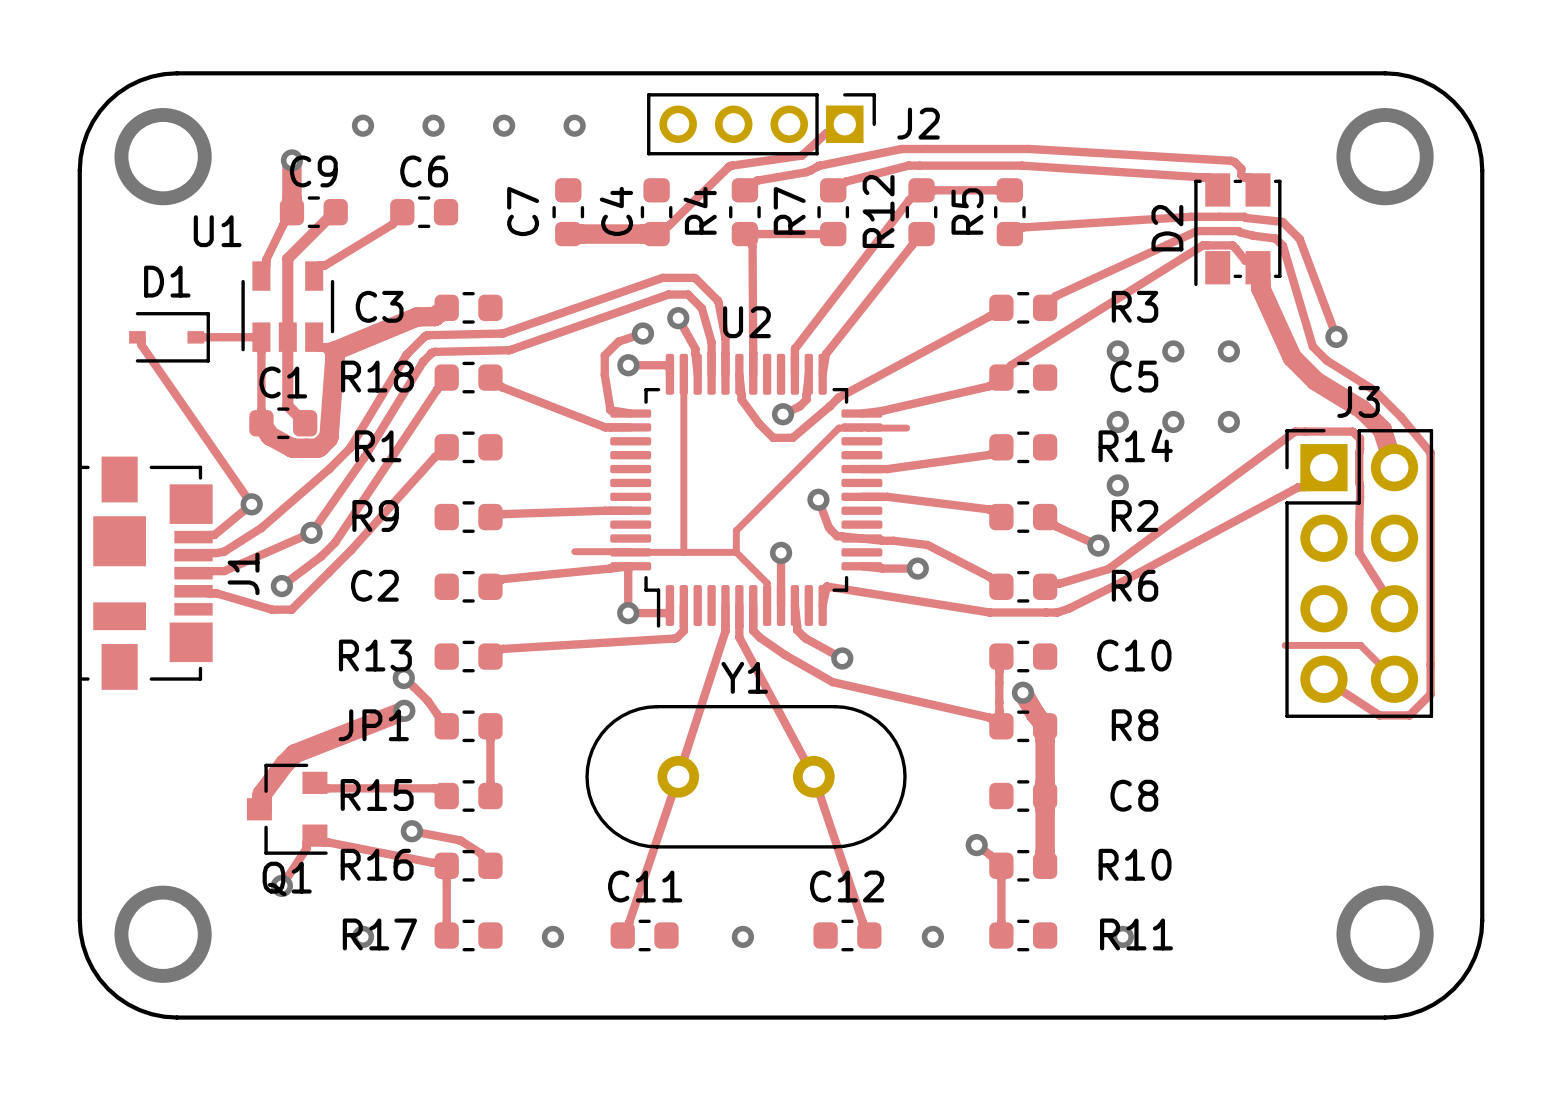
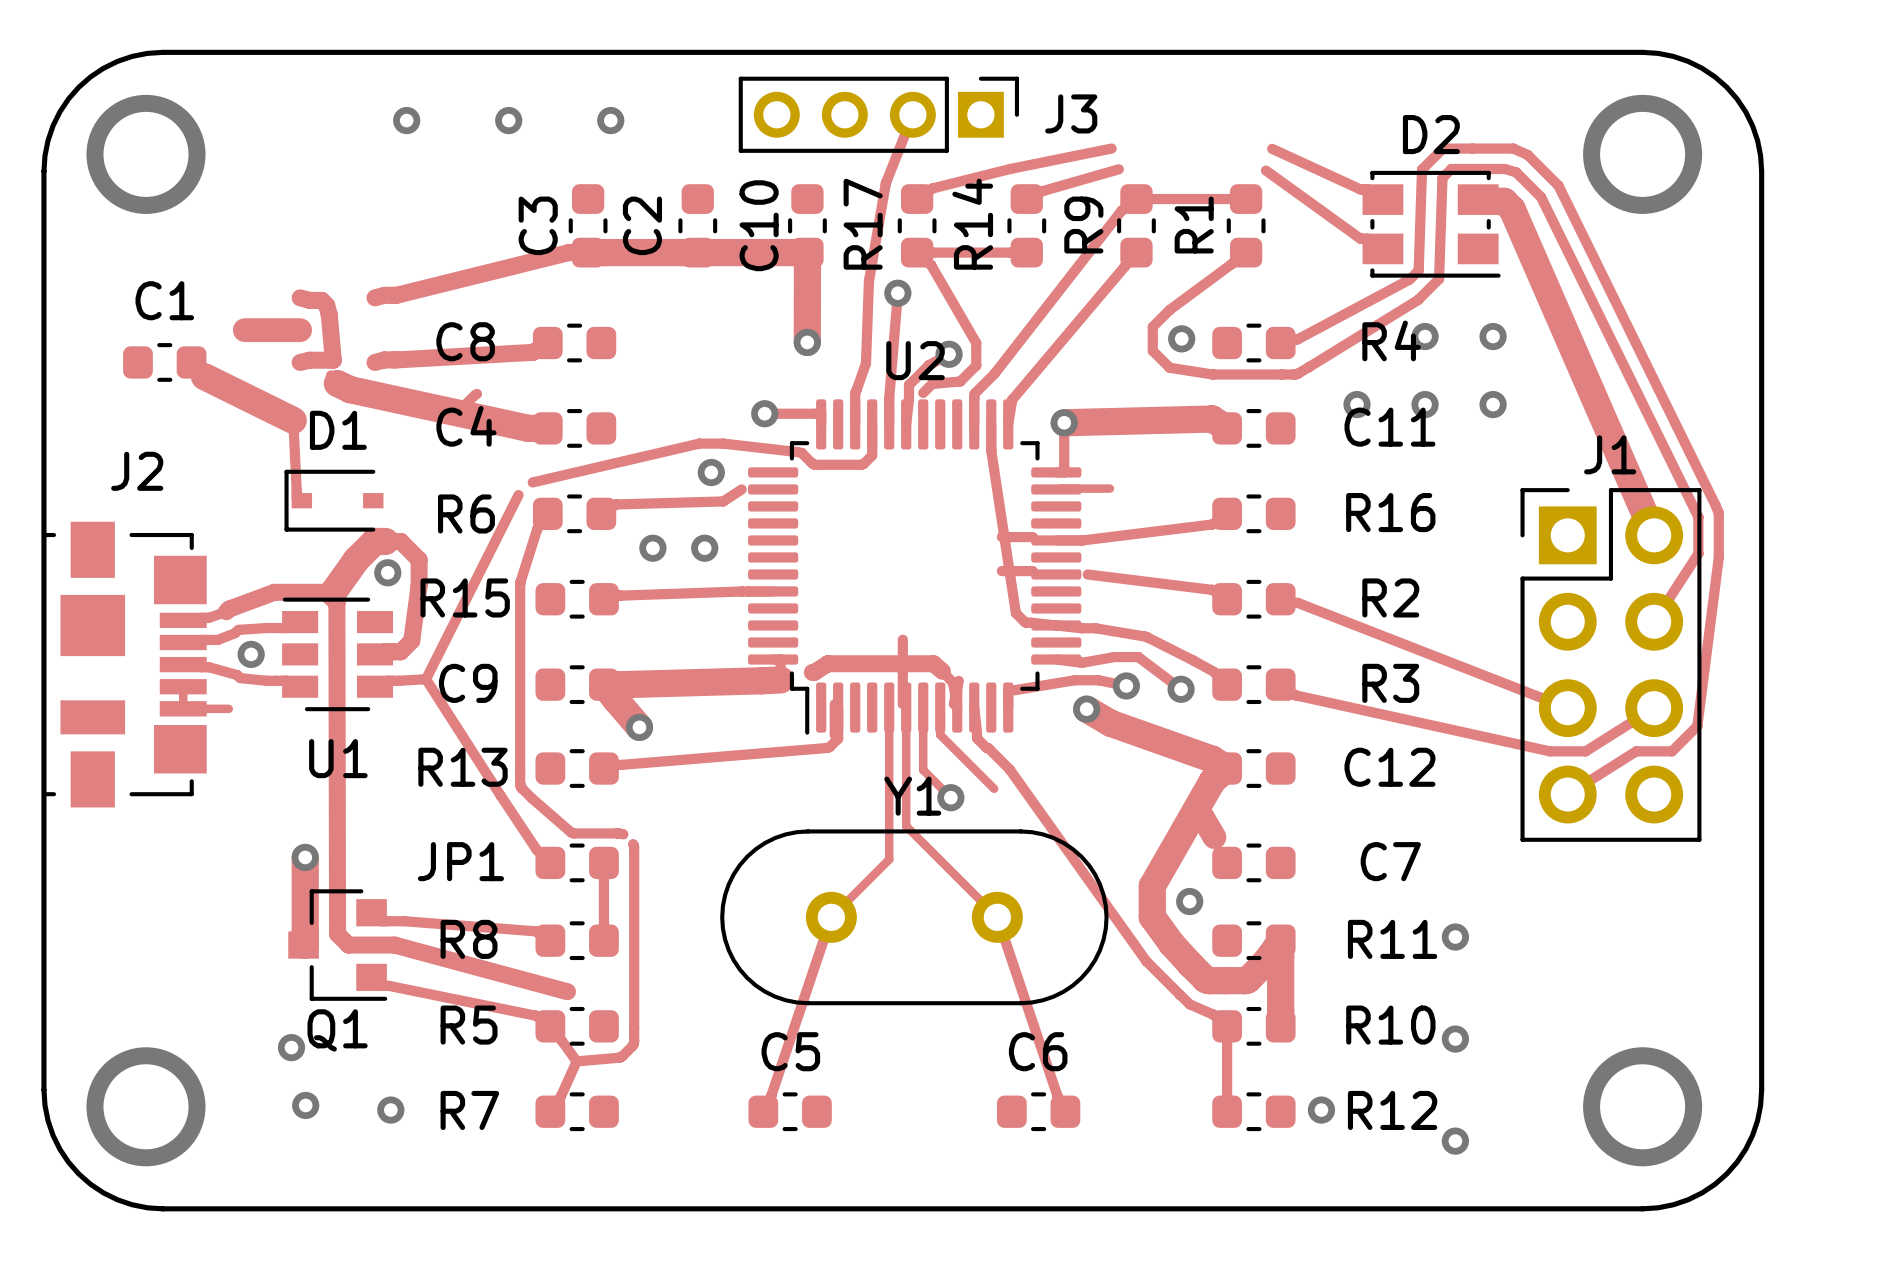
J2 name: J2 (918, 123) -> J3 (1071, 113)
track: none -> (912, 114) (886, 182)
track: (844, 124) (830, 133) (826, 133) (802, 155) (731, 165) -> none
via position: (363, 125) -> (406, 120)
via: (433, 125) -> none
via: (504, 125) -> none
via: (574, 125) -> none
via: none -> (508, 120)
via: none -> (610, 120)
track: (902, 148) (1029, 148) (1231, 160) (1241, 168) (1241, 175) (1243, 177) (1249, 177) (1258, 189) -> none
track: (901, 149) (819, 165) -> none
track: none -> (1111, 148) (1010, 168) (932, 188) (917, 199)
track: none -> (1272, 148) (1360, 189) (1367, 189) (1382, 199)
track: (291, 160) (291, 212) (283, 224) (266, 259) (266, 265) (261, 276) -> none
via: (291, 160) -> none
track: (908, 165) (845, 181) (833, 190) -> none
track: (909, 165) (1022, 165) (1209, 177) (1217, 189) -> none
track: (818, 166) (806, 172) (757, 180) (744, 190) -> none
track: (728, 167) (669, 225) (656, 234) (568, 234) -> none
track: none -> (1118, 169) (1043, 190)
track: none -> (1265, 170) (1360, 238) (1367, 238) (1382, 248)
C9 name position: C9 (313, 171) -> C9 (468, 683)
C6 name position: C6 (424, 171) -> C6 (1038, 1051)
track: none -> (885, 183) (868, 281) (865, 363) (855, 393) (855, 424)
track: (1009, 190) (921, 190) (909, 199) (794, 348) (794, 374) -> none
track: none -> (1246, 199) (1136, 199) (1121, 210) (994, 373) (974, 393) (974, 424)
R4 name position: R4 (700, 210) -> R4 (1391, 340)
C7 name position: C7 (523, 211) -> C7 (1390, 861)
R12 name position: R12 (878, 211) -> R12 (1392, 1110)
C9 position: (313, 212) -> (577, 684)
track: (335, 212) (287, 258) (287, 405) (305, 423) -> none
C6 position: (424, 212) -> (1038, 1111)
C7 rotation: 0° (568, 212) -> 90° clockwise (1253, 862)
C7 position: (568, 212) -> (1253, 862)
C4 rotation: 0° (656, 212) -> 90° clockwise (574, 428)
C4 position: (656, 212) -> (574, 428)
R4 rotation: 0° (744, 212) -> 90° clockwise (1253, 343)
R4 position: (744, 212) -> (1253, 343)
R7 rotation: 0° (833, 212) -> 90° clockwise (577, 1111)
R7 position: (833, 212) -> (577, 1111)
R12 rotation: 0° (921, 212) -> 90° clockwise (1253, 1111)
R12 position: (921, 212) -> (1253, 1111)
R5 rotation: 0° (1009, 212) -> 90° clockwise (577, 1026)
R5 position: (1009, 212) -> (577, 1026)
track: (392, 224) (324, 265) (319, 265) (314, 276) -> none
track: (1023, 227) (1191, 216) (1244, 216) (1282, 221) (1299, 238) (1336, 336) -> none
D2 name position: D2 (1167, 228) -> D2 (1431, 134)
D2 rotation: 0° (1237, 229) -> 90° counterclockwise (1431, 224)
U1 name position: U1 (217, 231) -> U1 (338, 758)
track: (833, 234) (744, 234) (752, 246) (753, 374) -> none
track: (921, 234) (825, 354) (822, 374) -> none
track: none -> (1026, 252) (917, 252) (931, 265)
track: none -> (931, 265) (976, 343) (976, 365) (960, 381) (932, 383) (923, 392)
track: none -> (1124, 266) (1012, 399) (1008, 424)
U1 footprint: [241, 261, 335, 352] -> [282, 597, 394, 712]
track: none -> (897, 293) (889, 398) (889, 424)
via: none -> (897, 293)
track: none -> (300, 297) (321, 300) (326, 305) (333, 360) (309, 360) (300, 362)
track: none -> (374, 297) (396, 295) (568, 252) (807, 252) (807, 342)
track: (1055, 296) (1196, 231) (1238, 231) (1253, 235) (1275, 238) (1283, 245) (1312, 346) (1326, 360) (1374, 390) (1401, 417) (1430, 452) -> (1246, 252) (1169, 309) (1152, 326) (1152, 350) (1169, 367) (1213, 374) (1298, 373) (1418, 299) (1439, 279) (1442, 177) (1451, 168) (1504, 168) (1516, 172) (1541, 197) (1698, 516)
track: none -> (244, 330) (300, 330)
via: none -> (1425, 336)
via: none -> (1493, 336)
track: (446, 307) (434, 316) (417, 317) (335, 350) (329, 436) (320, 446) (293, 448) (270, 436) -> none
C3 rotation: 0° (468, 307) -> 90° clockwise (588, 225)
C3 position: (468, 307) -> (588, 225)
track: (1001, 307) (989, 316) (838, 397) (830, 406) -> none
via: none -> (1181, 338)
R3 position: (1023, 307) -> (1253, 684)
track: none -> (547, 343) (532, 352) (384, 359) (374, 362)
via: none -> (807, 342)
track: (678, 318) (695, 348) (697, 374) -> none
via: (678, 318) -> none
track: none -> (949, 354) (929, 365) (908, 385) (906, 424)
via: none -> (949, 354)
track: (642, 333) (618, 341) (604, 355) (604, 375) (610, 410) (630, 413) -> none
via: (642, 333) -> none
track: (428, 335) (502, 333) (662, 277) (693, 277) (718, 302) (725, 338) (725, 374) -> none
via: (1336, 336) -> none
track: (137, 337) (141, 339) (141, 345) (251, 504) (214, 535) -> (325, 592) (274, 592) (208, 617)
D1 rotation: 0° (169, 337) -> 180° (333, 500)
D1 position: (169, 337) -> (333, 500)
track: (195, 337) (261, 337) (261, 423) (270, 435) -> none
track: (424, 337) (407, 354) -> none
track: none -> (204, 376) (293, 420) (296, 498) (301, 500)
track: none -> (337, 383) (350, 389) (528, 428) (547, 428)
track: (435, 351) (509, 350) (668, 294) (688, 294) (701, 308) (711, 342) (711, 374) -> none
via: (1117, 351) -> none
via position: (1173, 351) -> (1357, 404)
via position: (1228, 351) -> (1425, 404)
track: (406, 355) (349, 448) (329, 469) (261, 527) (224, 551) (212, 553) -> (300, 622) (287, 628) (238, 629) (217, 639) (206, 639)
via: none -> (1493, 404)
track: (422, 362) (364, 456) (311, 532) (224, 571) (193, 573) -> (300, 686) (287, 680) (240, 678) (237, 675) (208, 667) (183, 664)
track: (628, 365) (669, 365) (669, 374) -> none
via: (628, 365) -> none
track: (1010, 365) (1001, 377) (989, 386) (882, 410) (861, 413) -> none
track: (1011, 365) (1202, 245) (1232, 245) (1245, 260) (1249, 260) (1258, 267) (1260, 274) (1260, 288) (1292, 357) (1315, 381) (1361, 409) (1382, 429) (1394, 467) -> (1478, 199) (1504, 201) (1512, 209) (1654, 535)
track: none -> (764, 413) (821, 413) (821, 424)
via: none -> (764, 413)
track: none -> (1211, 419) (1064, 422) (1064, 472) (1056, 472)
track: (683, 374) (683, 552) -> none
track: (739, 374) (741, 399) (759, 424) (773, 437) (792, 437) (829, 406) -> none
track: (808, 374) (806, 399) (799, 406) (783, 414) -> none
via: none -> (1064, 422)
C5 name position: C5 (1134, 376) -> C5 (790, 1051)
track: (446, 377) (335, 542) (321, 556) (281, 586) -> none
R18: (468, 377) -> none
track: none -> (872, 424) (872, 455) (861, 464) (814, 464) (801, 453) (796, 452) (723, 443) (699, 443) (532, 482)
track: none -> (991, 424) (991, 450) (1015, 613) (1026, 622) (1095, 628) (1145, 636) (1213, 671) (1227, 684)
C5 position: (1023, 377) -> (790, 1111)
C1 name position: C1 (283, 382) -> C1 (164, 300)
track: (502, 387) (605, 427) (630, 427) -> none
J3 name: J3 (1358, 401) -> J1 (1610, 454)
via: (783, 414) -> none
via: none -> (711, 472)
via: (1117, 421) -> none
via: (1173, 421) -> none
via: (1228, 421) -> none
C1 position: (283, 423) -> (164, 362)
track: (906, 428) (838, 428) (736, 530) (736, 552) -> none
track: none -> (1109, 488) (1056, 489)
track: none -> (741, 489) (723, 501) (616, 504)
track: none -> (518, 495) (426, 679)
R14 name position: R14 (1135, 445) -> R14 (972, 224)
R1 rotation: 0° (468, 447) -> 90° clockwise (1246, 225)
R1 position: (468, 447) -> (1246, 225)
R14 rotation: 0° (1023, 447) -> 90° clockwise (1026, 225)
R14 position: (1023, 447) -> (1026, 225)
track: none -> (547, 513) (537, 529) (520, 581)
track: none -> (1227, 513) (1212, 524) (1082, 540) (1056, 540)
track: (989, 454) (887, 469) -> none
track: (434, 457) (351, 550) (291, 609) (272, 609) (216, 593) (193, 591) -> (228, 708) (183, 708) (183, 686)
track: (1323, 467) (1304, 487) (1298, 487) (1115, 585) (1057, 612) (989, 612) (827, 586) -> none
via: none -> (652, 548)
via: none -> (704, 548)
track: (1430, 482) (1430, 694) -> (1698, 553) (1654, 621)
via: (1117, 485) -> none
U2 position: (746, 490) -> (914, 566)
track: (887, 496) (989, 509) -> (1087, 574) (1212, 589)
via: none -> (387, 572)
track: (818, 499) (828, 527) (837, 536) (927, 544) (989, 577) (1001, 586) -> none
via: (818, 499) -> none
via: (251, 504) -> none
track: none -> (520, 584) (520, 783)
track: (630, 510) (498, 514) (490, 517) -> none
track: none -> (773, 591) (613, 595) (603, 599)
track: none -> (333, 592) (356, 559) (374, 541) (400, 541) (419, 559) (419, 585) (411, 640) (400, 651) (384, 651) (374, 654)
R9 rotation: 0° (468, 517) -> 90° clockwise (1136, 225)
R9 position: (468, 517) -> (1136, 225)
R2 position: (1023, 517) -> (1253, 599)
track: (1045, 517) (1056, 526) (1098, 545) -> none
track: none -> (1280, 599) (1297, 602) (1567, 708)
track: none -> (336, 603) (337, 934) (348, 945) (394, 945) (567, 991)
via: (311, 532) -> none
via: (1098, 545) -> none
track: (574, 551) (630, 551) -> none
track: (630, 552) (736, 552) -> none
track: (736, 552) (767, 583) (767, 605) -> none
via: (781, 552) -> none
via: none -> (251, 654)
track: (861, 566) (917, 568) -> none
via: (917, 568) -> none
track: none -> (773, 659) (780, 659) (780, 679) (603, 684) (639, 727)
track: none -> (1056, 659) (1082, 662) (1114, 657) (1138, 657) (1181, 689)
J1 name: J1 (243, 573) -> J2 (137, 471)
track: (502, 579) (610, 568) (630, 566) (628, 566) (628, 613) (669, 613) (669, 605) -> none
track: none -> (812, 672) (827, 663) (933, 663) (953, 682) (957, 707)
track: none -> (426, 679) (387, 680) (374, 686)
track: none -> (426, 679) (536, 849)
R6 name position: R6 (1135, 585) -> R6 (466, 513)
via: (281, 586) -> none
C2 rotation: 0° (468, 586) -> 90° clockwise (697, 225)
C2 position: (468, 586) -> (697, 225)
R6 position: (1023, 586) -> (574, 513)
track: (1045, 586) (1108, 569) (1295, 431) (1352, 431) (1360, 438) (1359, 552) (1394, 608) -> (1280, 684) (1295, 695) (1549, 751) (1585, 751) (1654, 708)
track: none -> (1126, 685) (1098, 680) (1074, 680) (1008, 690) (1008, 707)
via: none -> (1126, 685)
via: none -> (1181, 689)
track: (683, 605) (683, 630) (675, 638) (502, 648) -> none
track: (739, 605) (739, 637) (813, 776) (862, 922) -> none
track: (753, 605) (753, 630) (760, 637) (785, 655) (832, 682) (989, 717) (1001, 726) (999, 702) (999, 665) (1001, 656) -> none
track: (794, 605) (797, 630) (805, 638) (842, 658) -> none
track: none -> (838, 707) (838, 738) (827, 747) (613, 764) (603, 768)
track: none -> (889, 707) (889, 859) (831, 917) (771, 1095)
track: none -> (906, 707) (906, 826) (997, 917) (1057, 1095)
track: none -> (923, 707) (923, 770) (950, 797)
track: none -> (940, 707) (940, 734) (994, 788)
track: none -> (974, 707) (977, 738) (1009, 769) (1146, 961) (1189, 1004) (1212, 1014) (1227, 1026) (1227, 1111)
track: none -> (1086, 709) (1110, 723) (1212, 759)
via: none -> (1086, 709)
via position: (628, 613) -> (639, 727)
track: (725, 631) (629, 922) -> none
track: (1285, 645) (1360, 645) (1394, 679) -> none
C10 name position: C10 (1134, 655) -> C10 (759, 225)
R13 position: (468, 656) -> (577, 768)
C10 rotation: 0° (1023, 656) -> 90° clockwise (807, 225)
C10 position: (1023, 656) -> (807, 225)
via position: (842, 658) -> (950, 797)
track: none -> (1212, 780) (1152, 886) (1152, 917) (1171, 944) (1208, 980) (1248, 979) (1270, 956) (1280, 940) (1280, 1026)
track: none -> (521, 788) (571, 832) (623, 834)
track: (403, 678) (427, 701) (446, 726) -> none
via: (403, 678) -> none
track: (1323, 679) (1379, 715) -> (1567, 794) (1636, 751) (1672, 751) (1697, 726) (1718, 557) (1718, 513) (1558, 185) (1527, 154) (1513, 148) (1442, 148) (1422, 169) (1418, 270) (1409, 279) (1297, 339) (1280, 343)
via: (1022, 692) -> none
track: (1430, 694) (1409, 715) -> none
Y1 footprint: [585, 704, 907, 849] -> [720, 829, 1109, 1006]
track: (404, 710) (294, 753) (284, 764) (262, 794) (262, 807) (259, 809) -> none
via: (404, 710) -> none
track: (1035, 714) (1045, 726) (1045, 865) -> none
track: (1379, 715) (1409, 715) -> none
track: none -> (633, 844) (634, 1042) (620, 1057) (576, 1061)
R8 name position: R8 (1135, 725) -> R8 (469, 939)
JP1 position: (468, 726) -> (577, 862)
track: (490, 726) (490, 796) -> none
R8 position: (1023, 726) -> (577, 940)
track: none -> (305, 857) (305, 945) (303, 945)
via: none -> (305, 857)
track: none -> (603, 862) (603, 940)
via: none -> (1189, 901)
track: none -> (371, 912) (381, 921) (535, 931) (550, 940)
track: (314, 782) (323, 788) (434, 788) (446, 796) -> none
C8 name position: C8 (1134, 795) -> C8 (465, 341)
via: none -> (1455, 937)
R15 position: (468, 796) -> (577, 599)
C8 position: (1023, 796) -> (574, 343)
Q1 position: (287, 809) -> (337, 945)
track: none -> (371, 977) (381, 985) (535, 1015) (550, 1026) (576, 1061)
track: (411, 831) (459, 840) -> none
via: (411, 831) -> none
track: (460, 840) (480, 853) -> none
track: (976, 845) (1001, 865) (1001, 935) -> none
via: (976, 845) -> none
R16 name position: R16 (377, 864) -> R16 (1390, 512)
R16 position: (468, 865) -> (1253, 513)
R10 position: (1023, 865) -> (1253, 1026)
via: none -> (1455, 1039)
track: (281, 885) (306, 848) (306, 842) (314, 835) (323, 842) (438, 862) (446, 865) (446, 935) -> none
C11 name position: C11 (645, 886) -> C11 (1389, 427)
C12 name position: C12 (847, 886) -> C12 (1389, 767)
track: none -> (576, 1061) (560, 1096) (550, 1111)
via: none -> (305, 1105)
R17 rotation: 0° (468, 935) -> 90° clockwise (917, 225)
R17 position: (468, 935) -> (917, 225)
C11 position: (644, 935) -> (1253, 428)
C12 position: (847, 935) -> (1253, 768)
R11 position: (1023, 935) -> (1253, 940)
via: (552, 936) -> none
via: (742, 936) -> none
via: (932, 936) -> none
via: none -> (1455, 1141)

